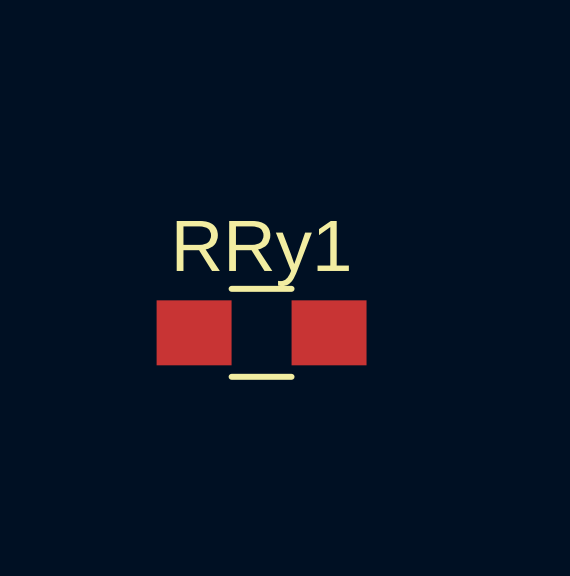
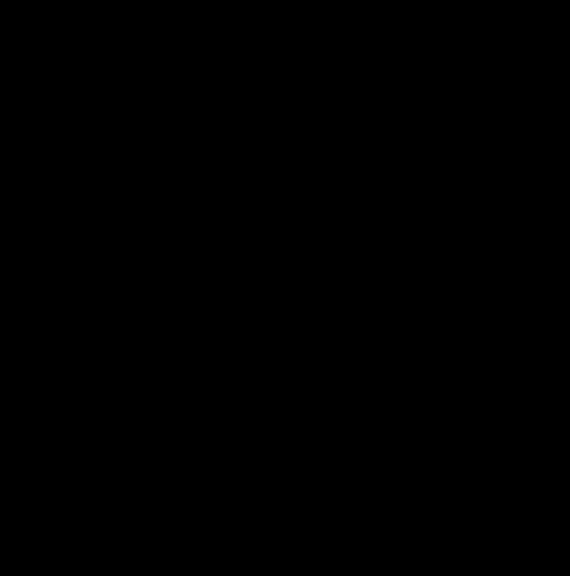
RRy1: (261, 332) -> none

